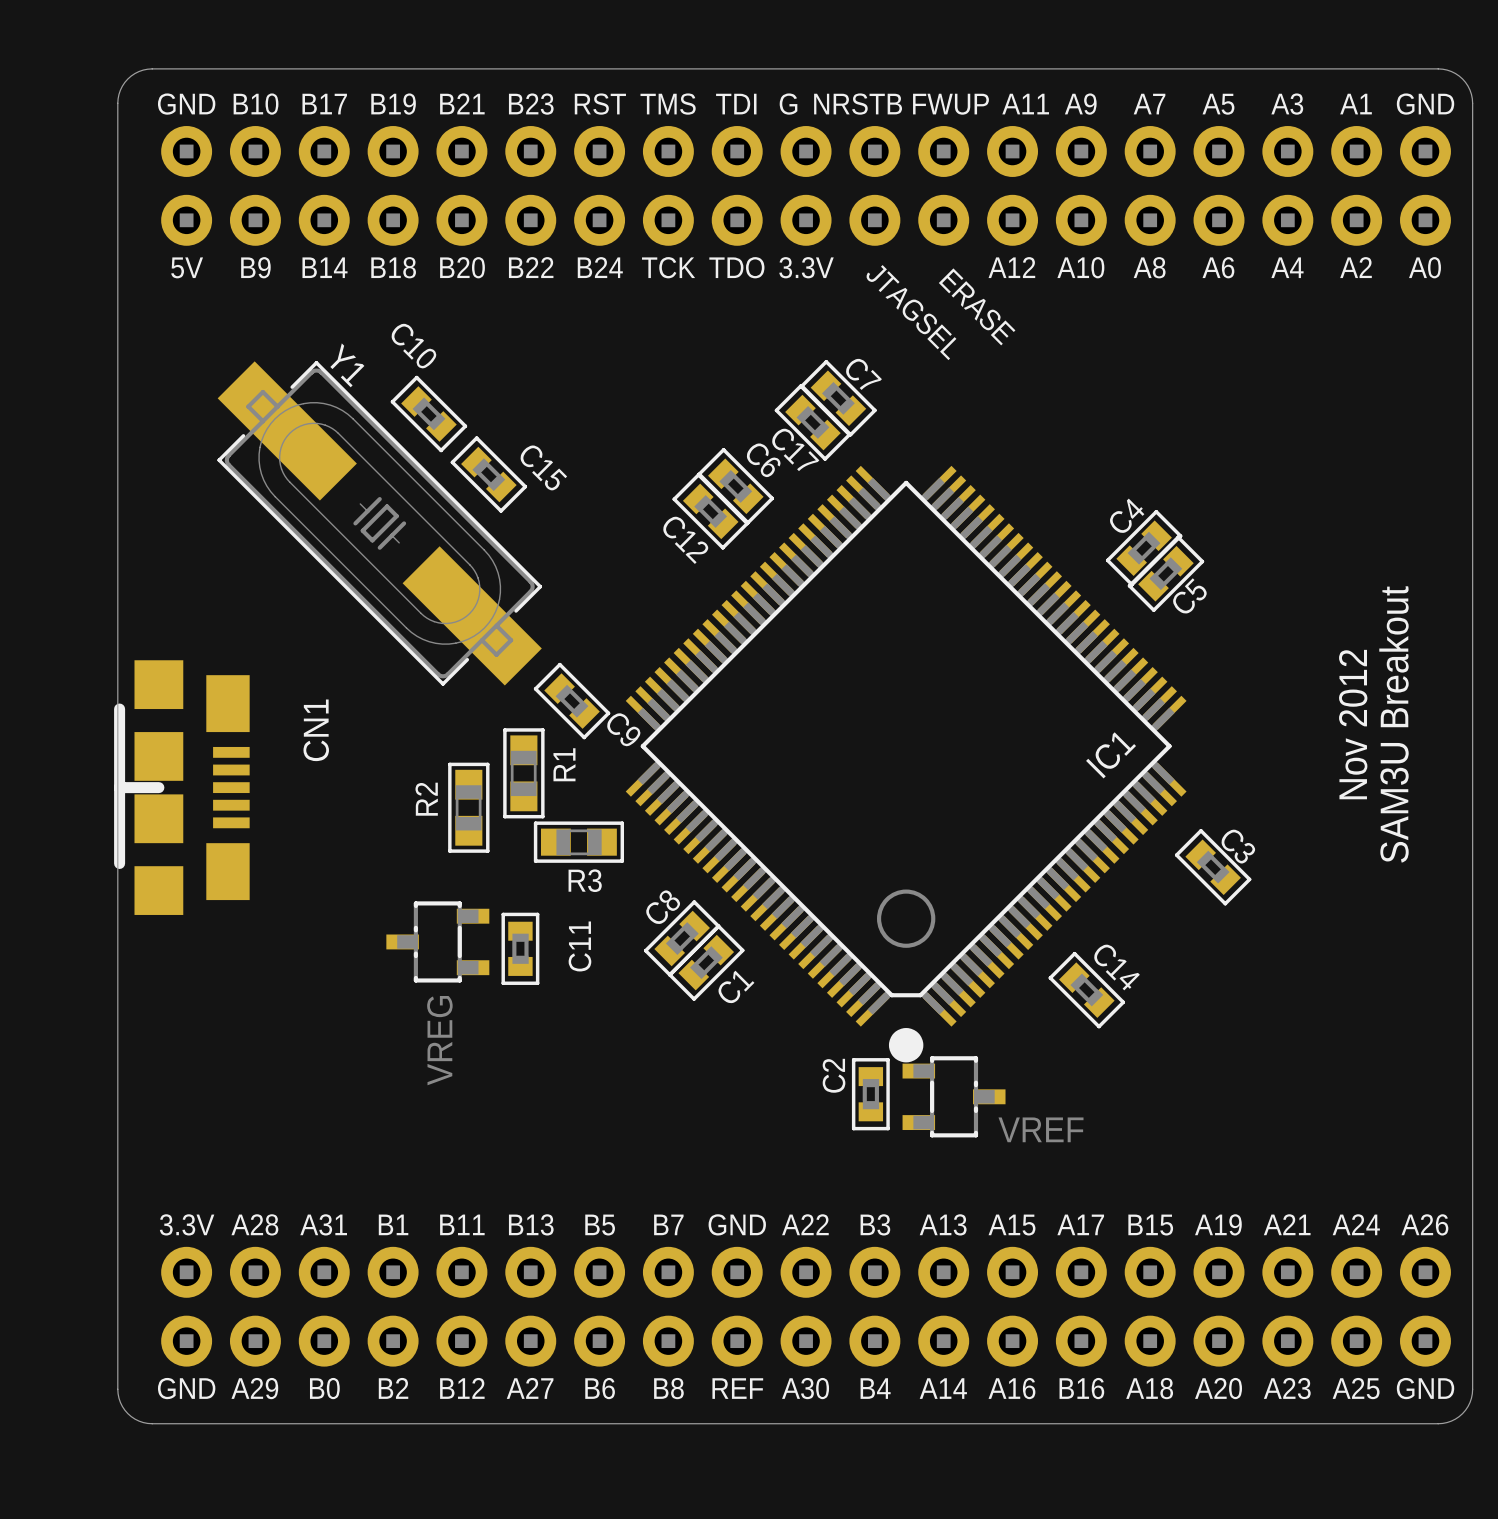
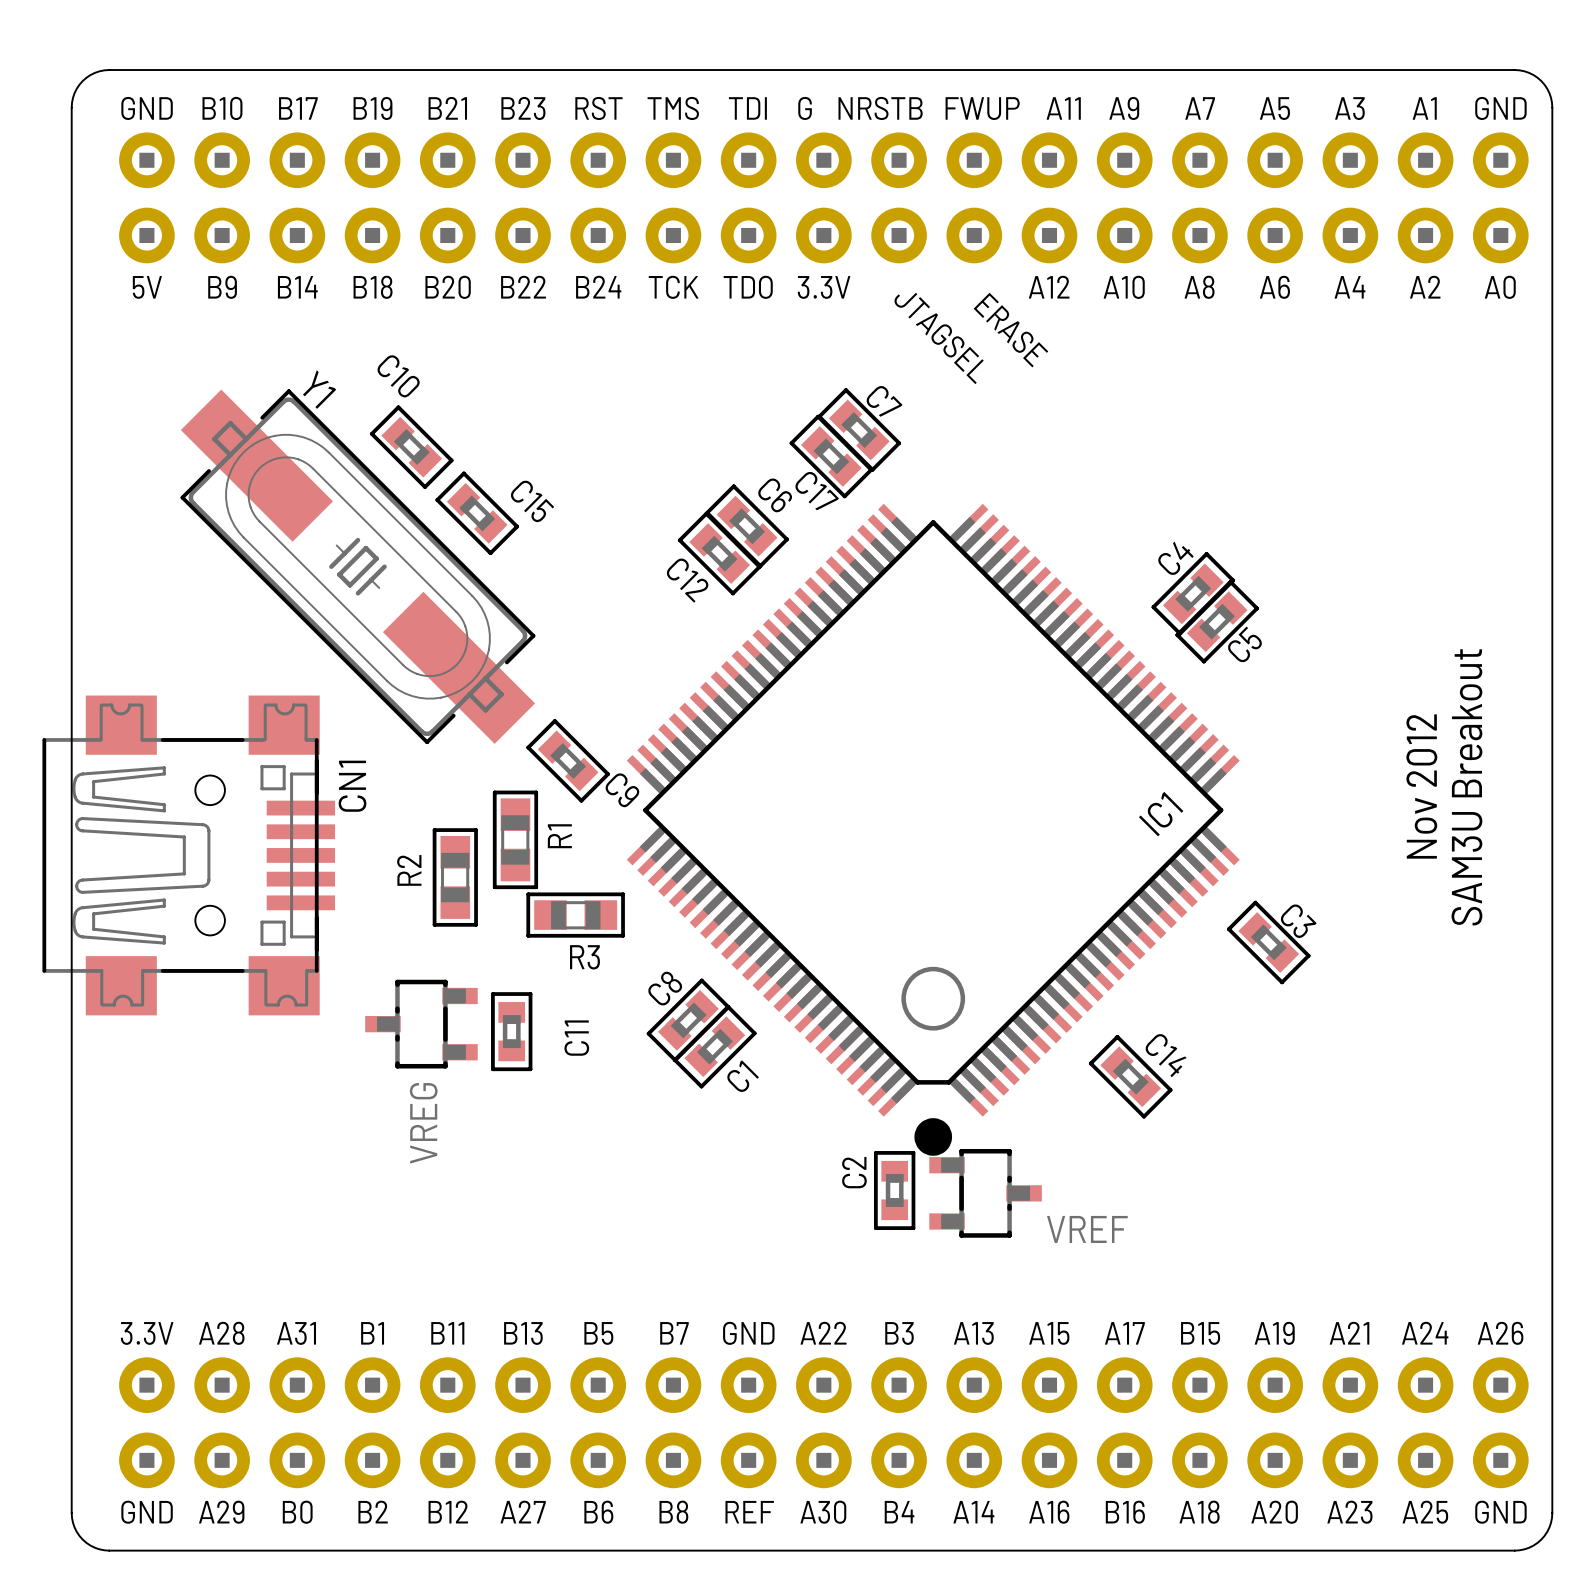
CN1 footprint: [114, 660, 250, 915] -> [42, 695, 336, 1016]

